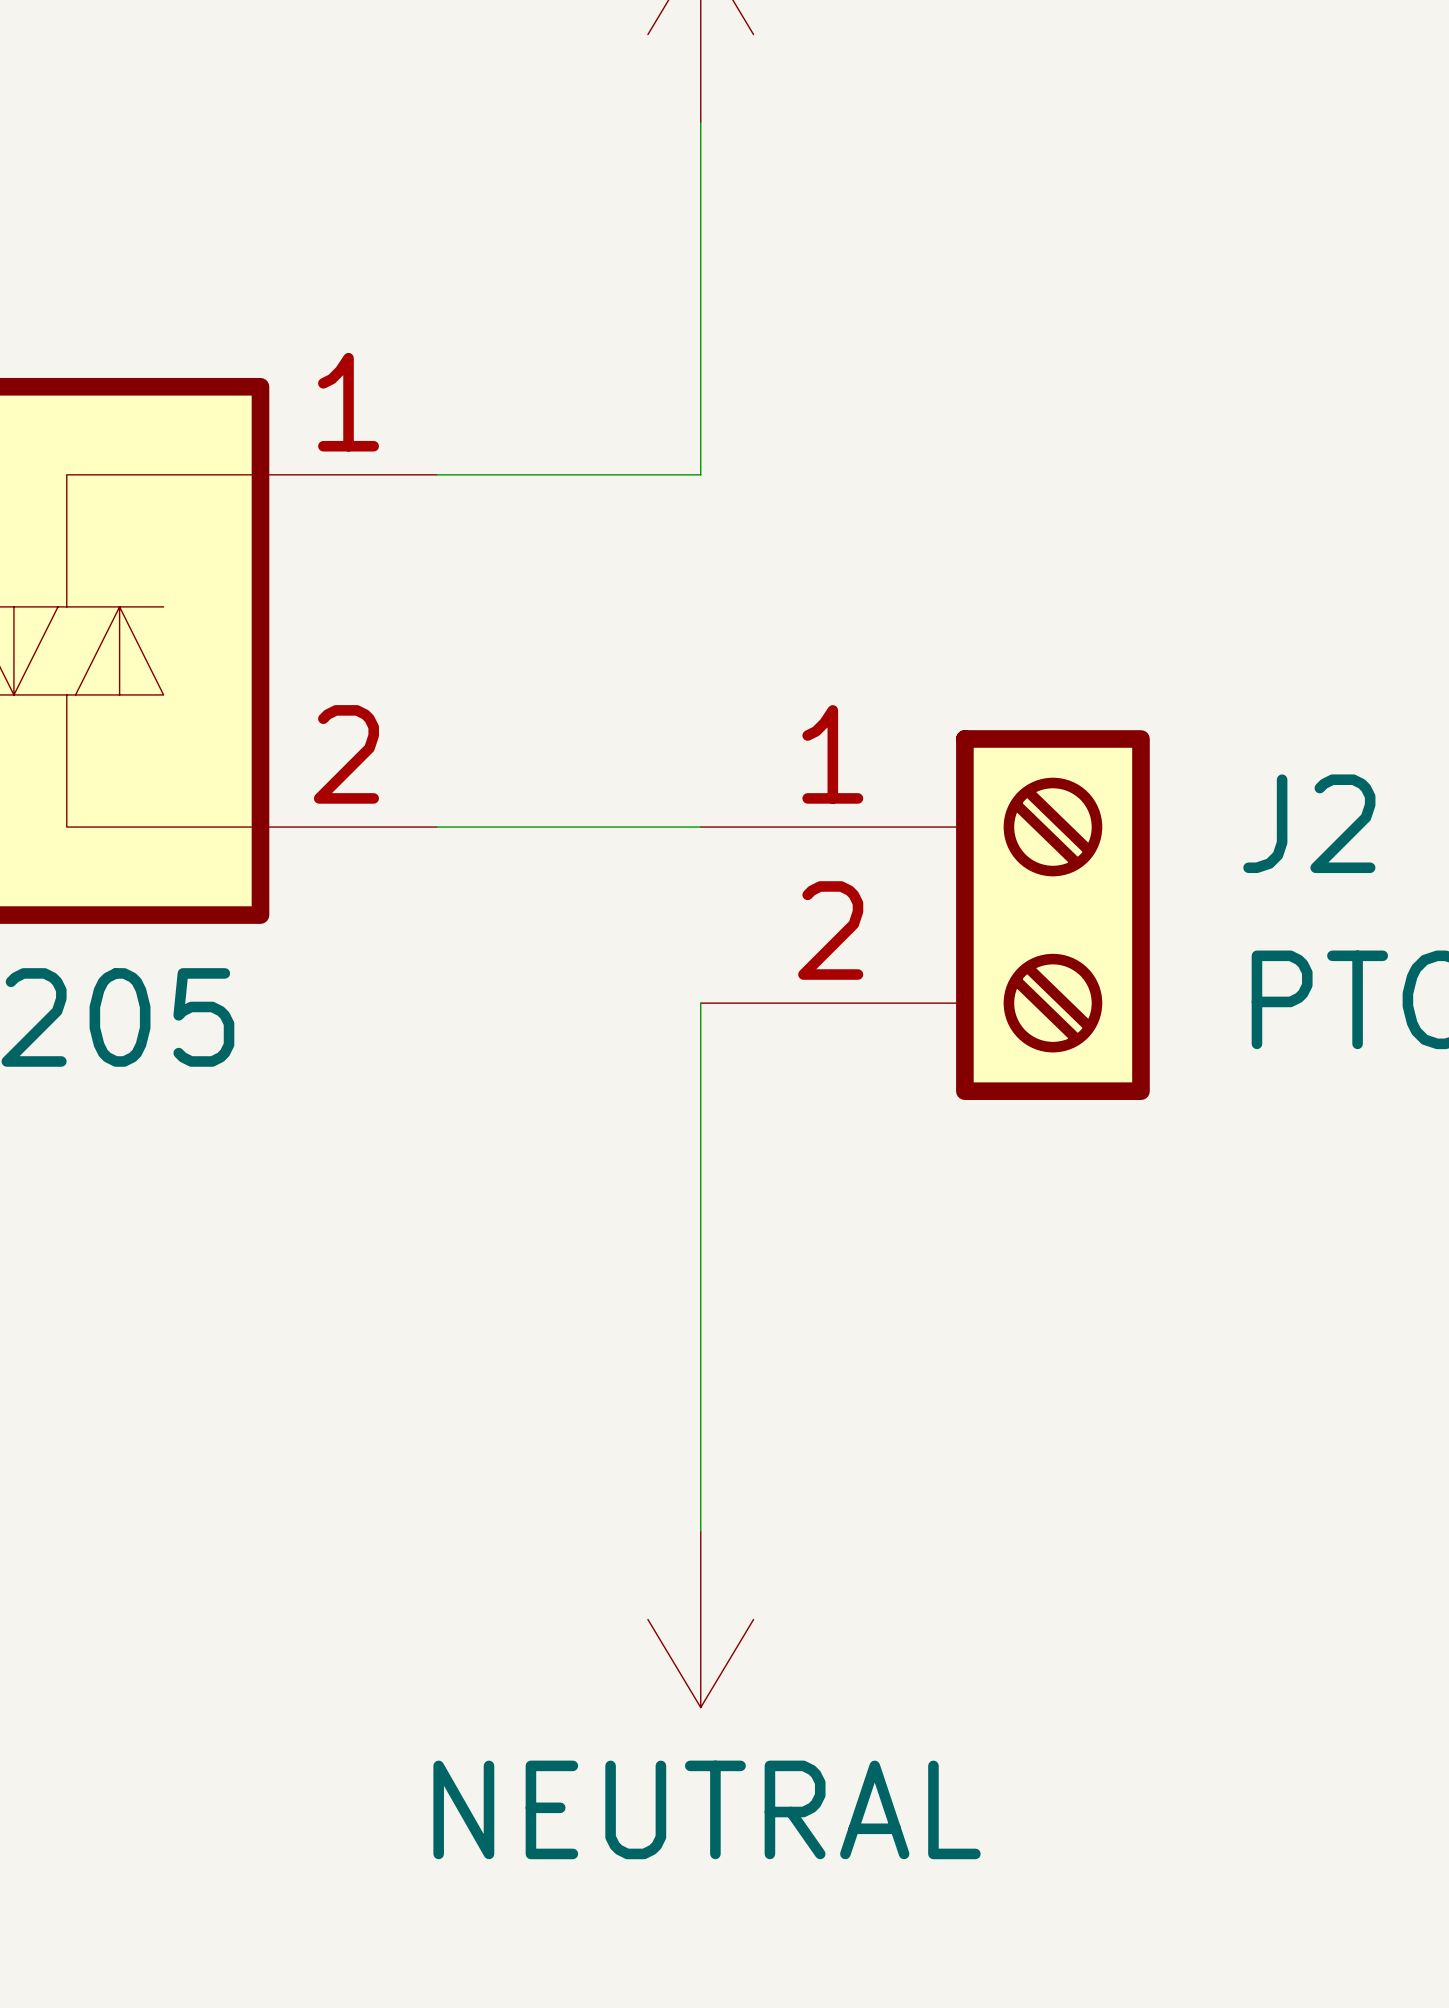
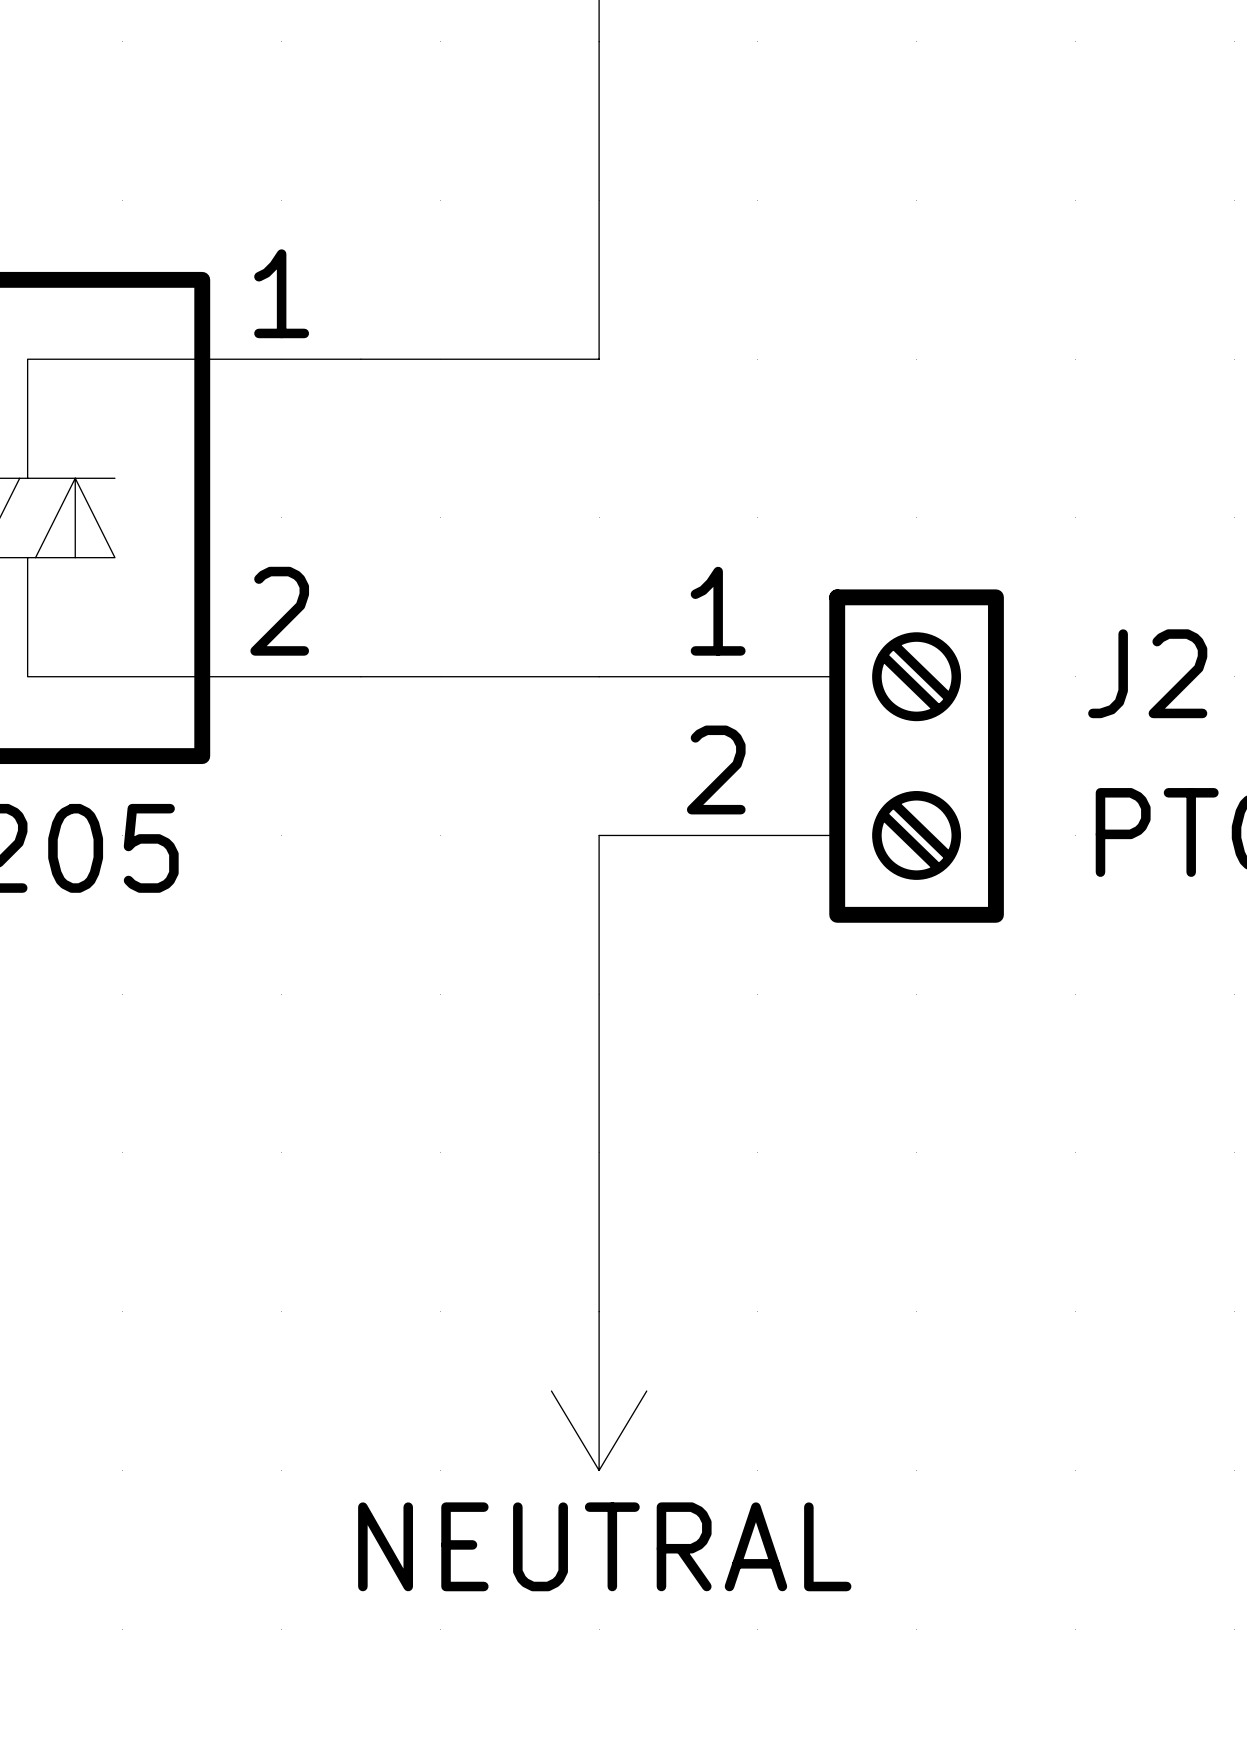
power symbol text position: NEUTRAL (707, 1809) -> NEUTRAL (604, 1546)

